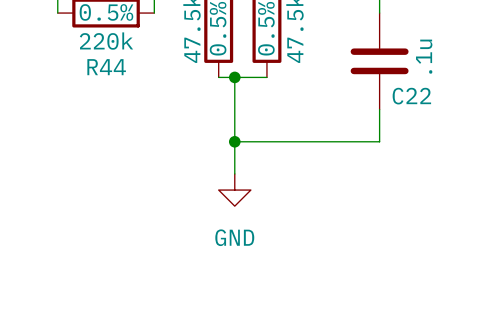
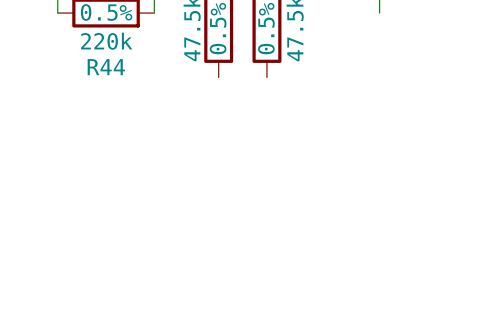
C22: .1u (379, 61) -> none
wire: (218, 77) (266, 77) -> none
wire: (234, 77) (234, 173) -> none
junction: (234, 77) -> none
wire: (379, 109) (379, 141) (234, 141) -> none
junction: (234, 141) -> none
power symbol: GND (234, 190) -> none

